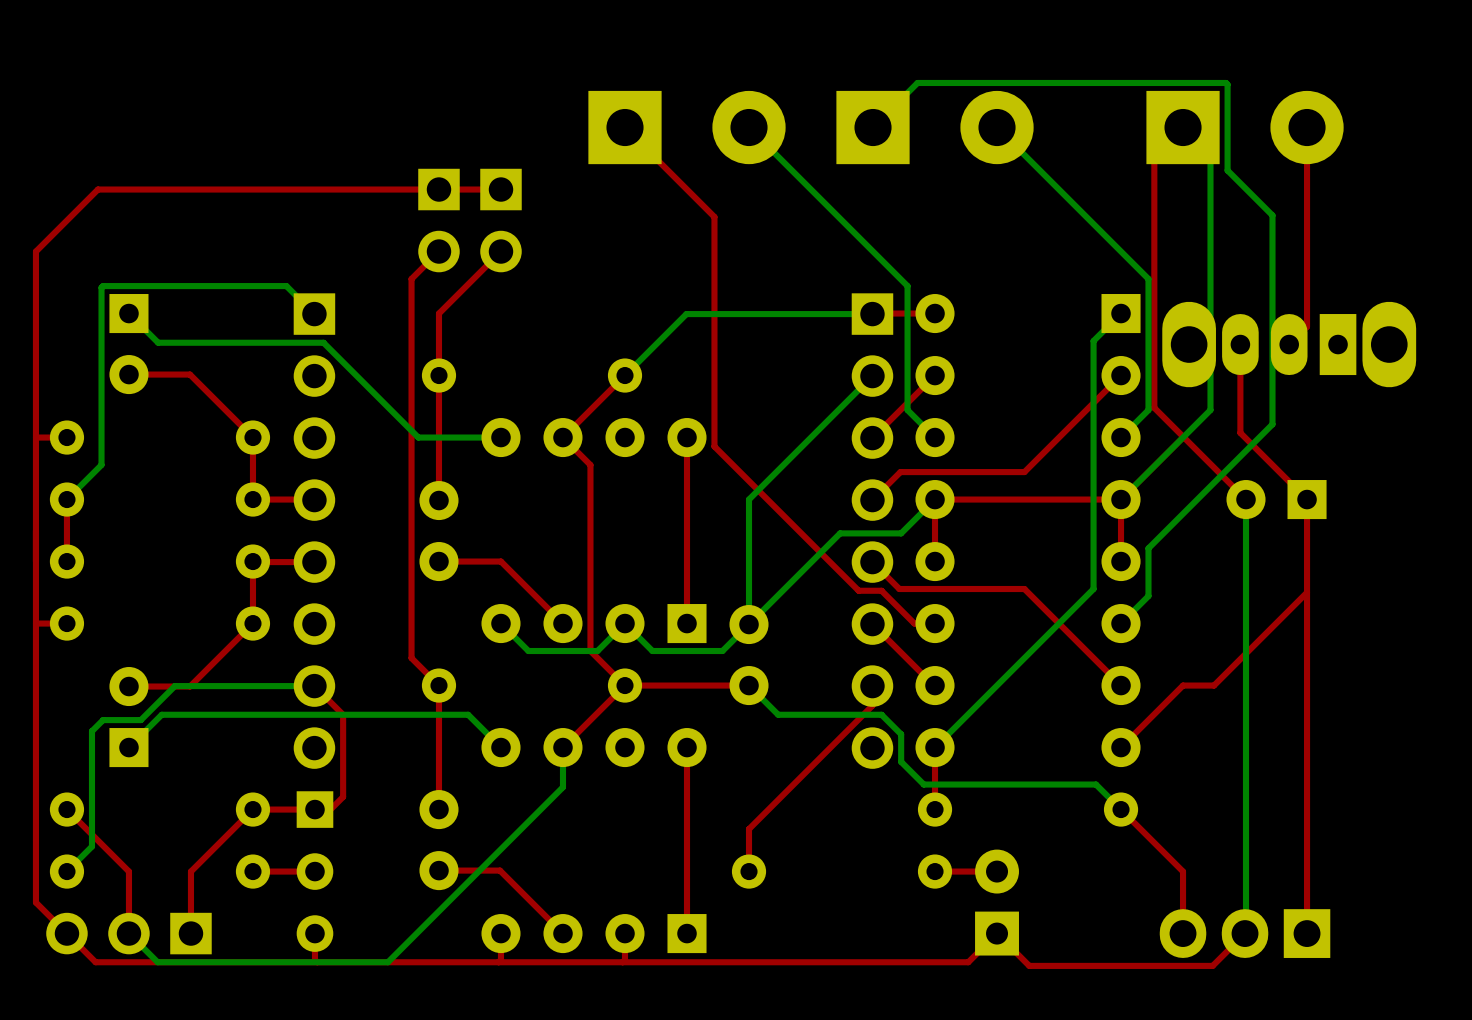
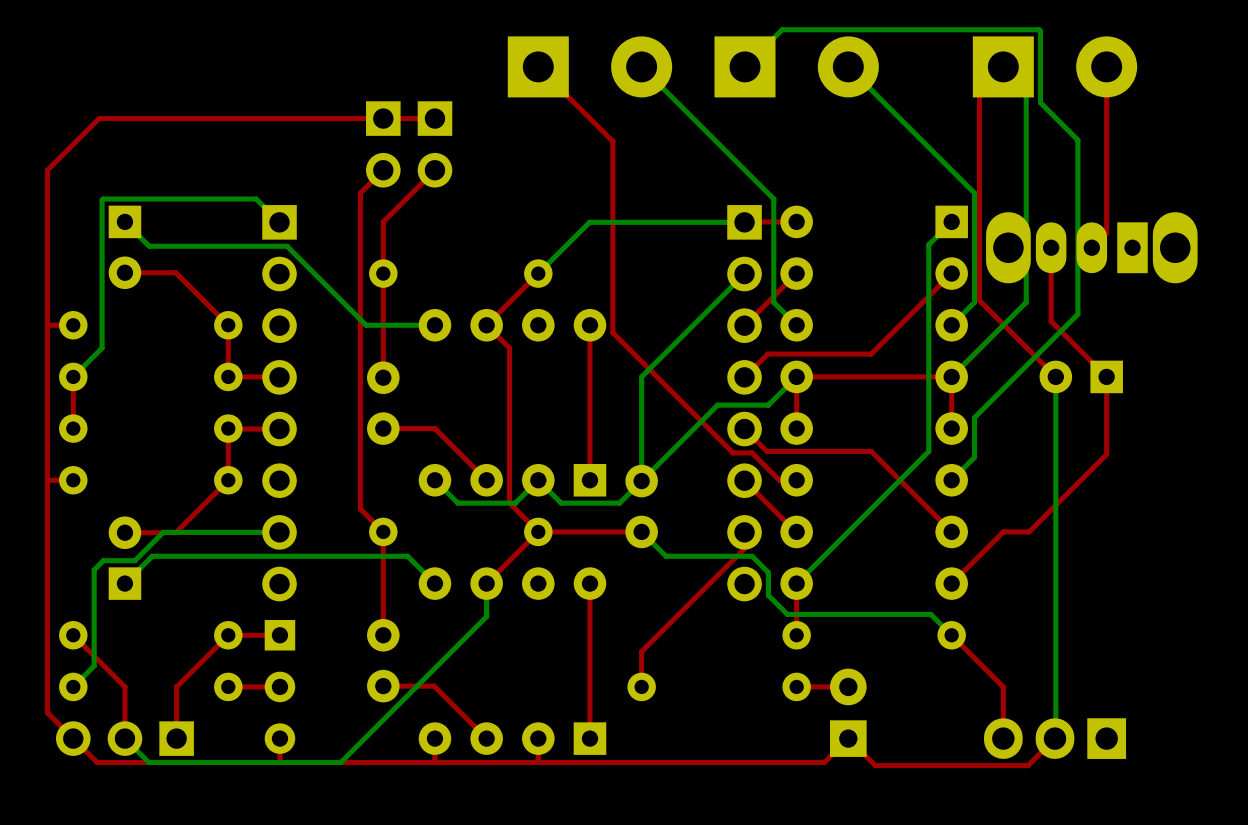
top track: (1307, 592) (1307, 933) -> none
top track: (314, 686) (343, 714) (343, 796) (322, 817) -> none

